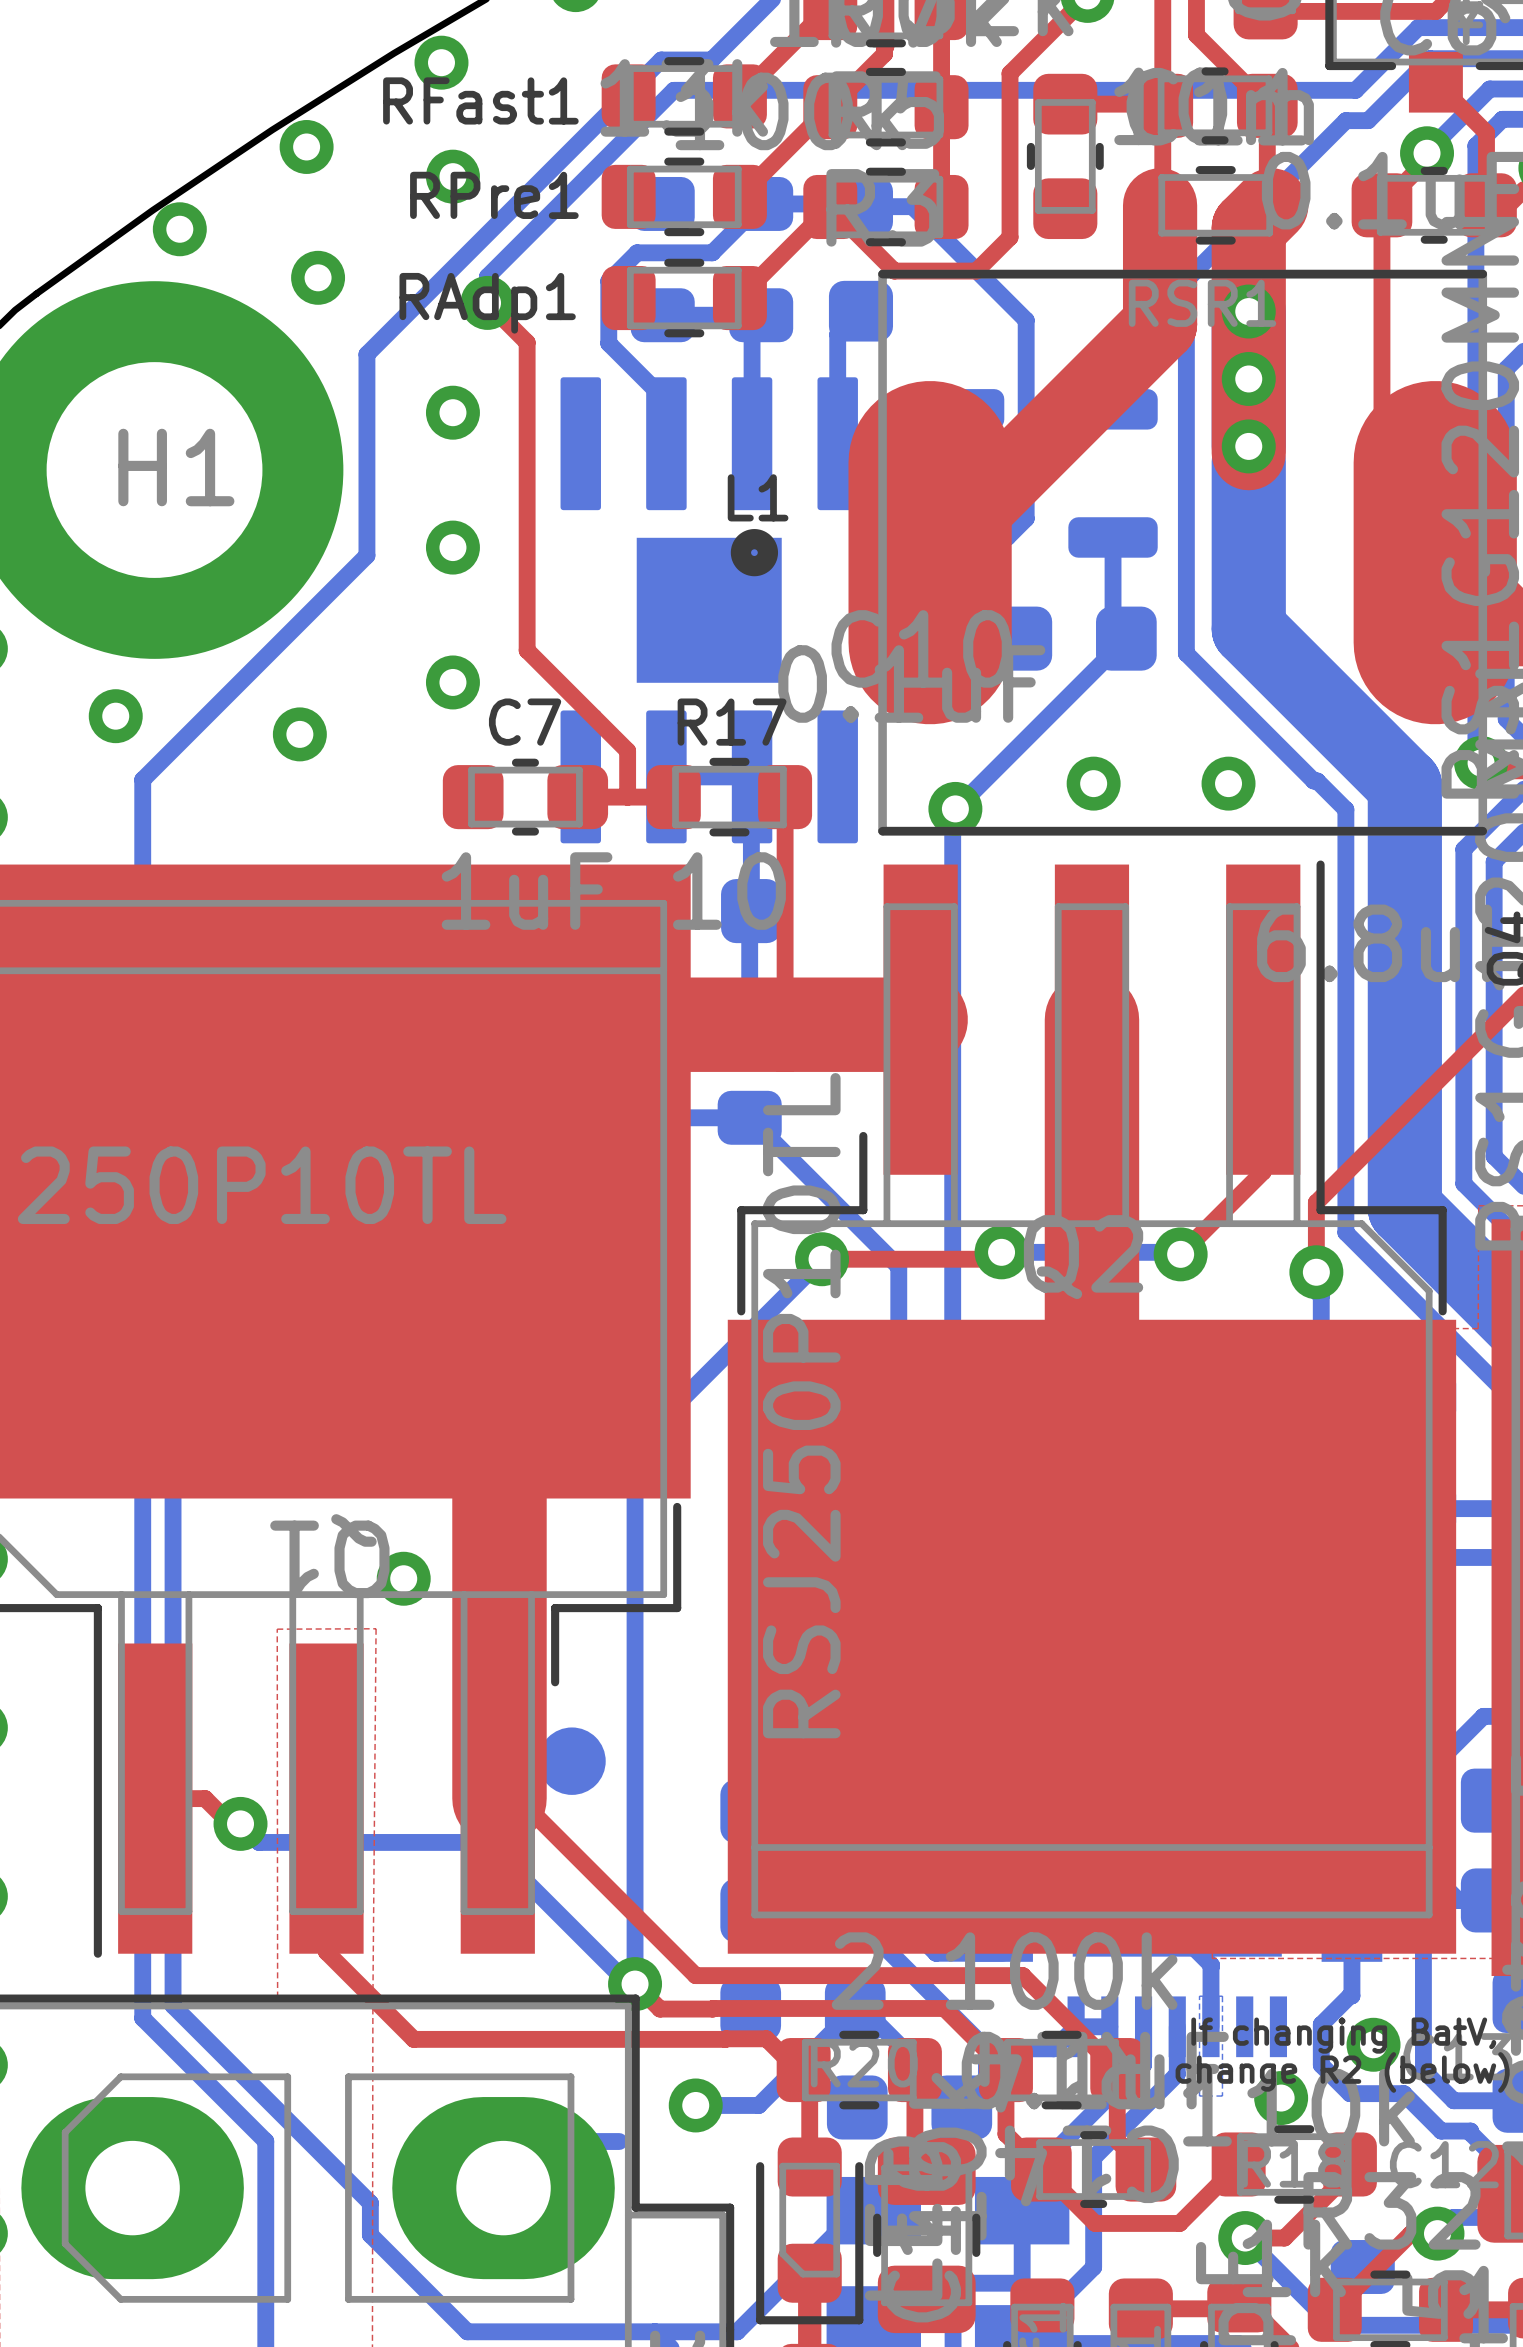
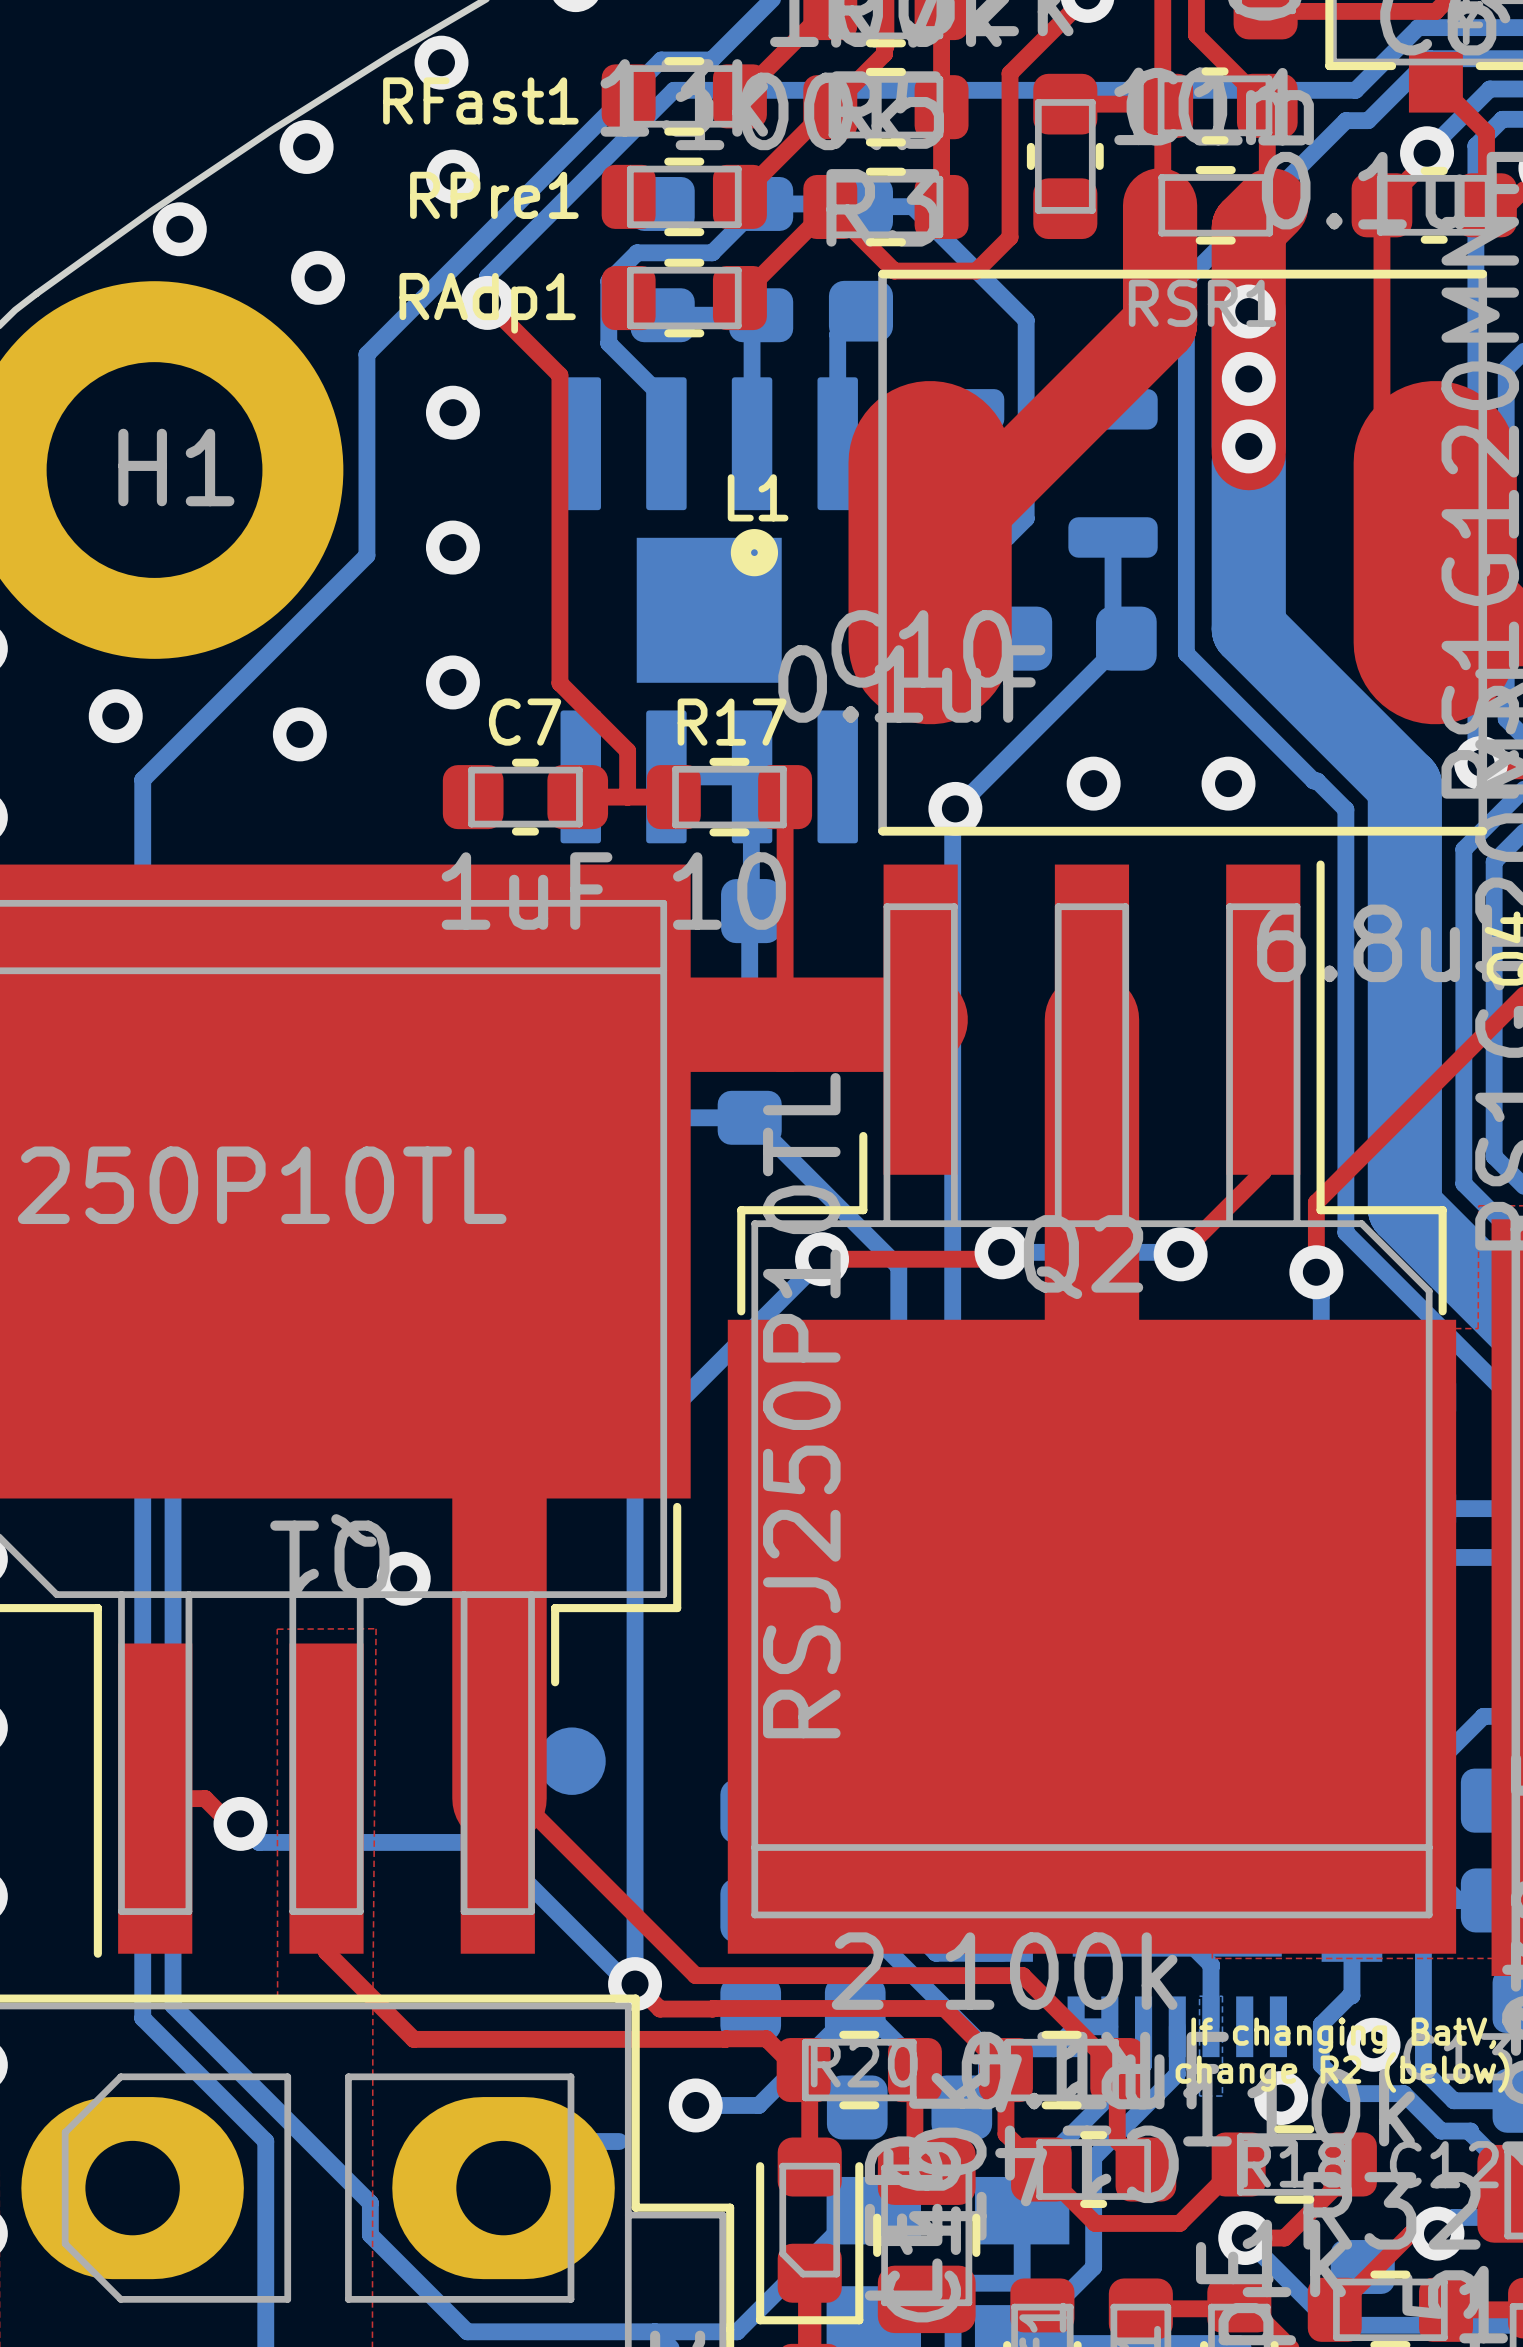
top track: (527, 342) (527, 650) (559, 683) -> (527, 342) (559, 375) (559, 683)

